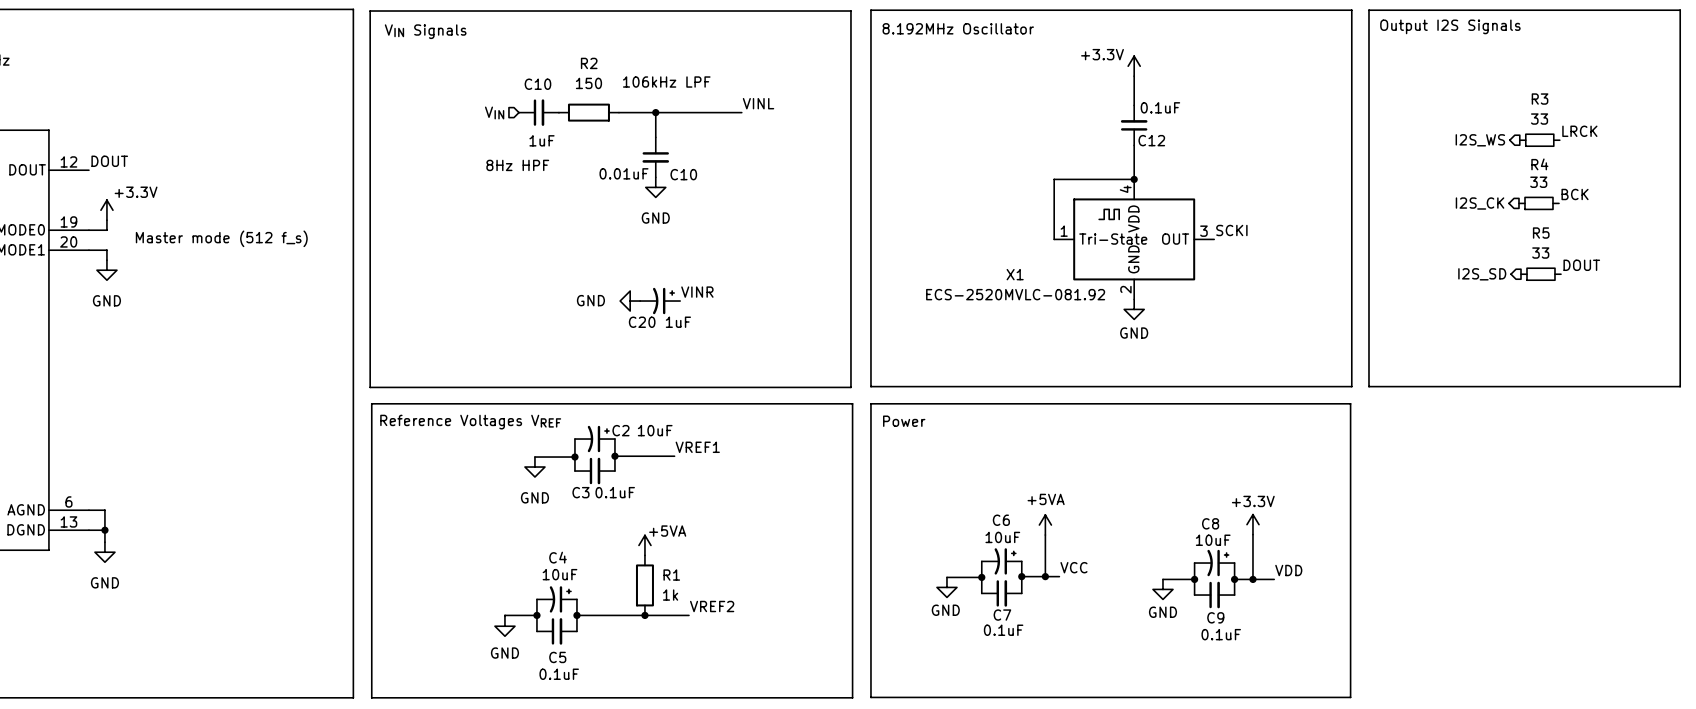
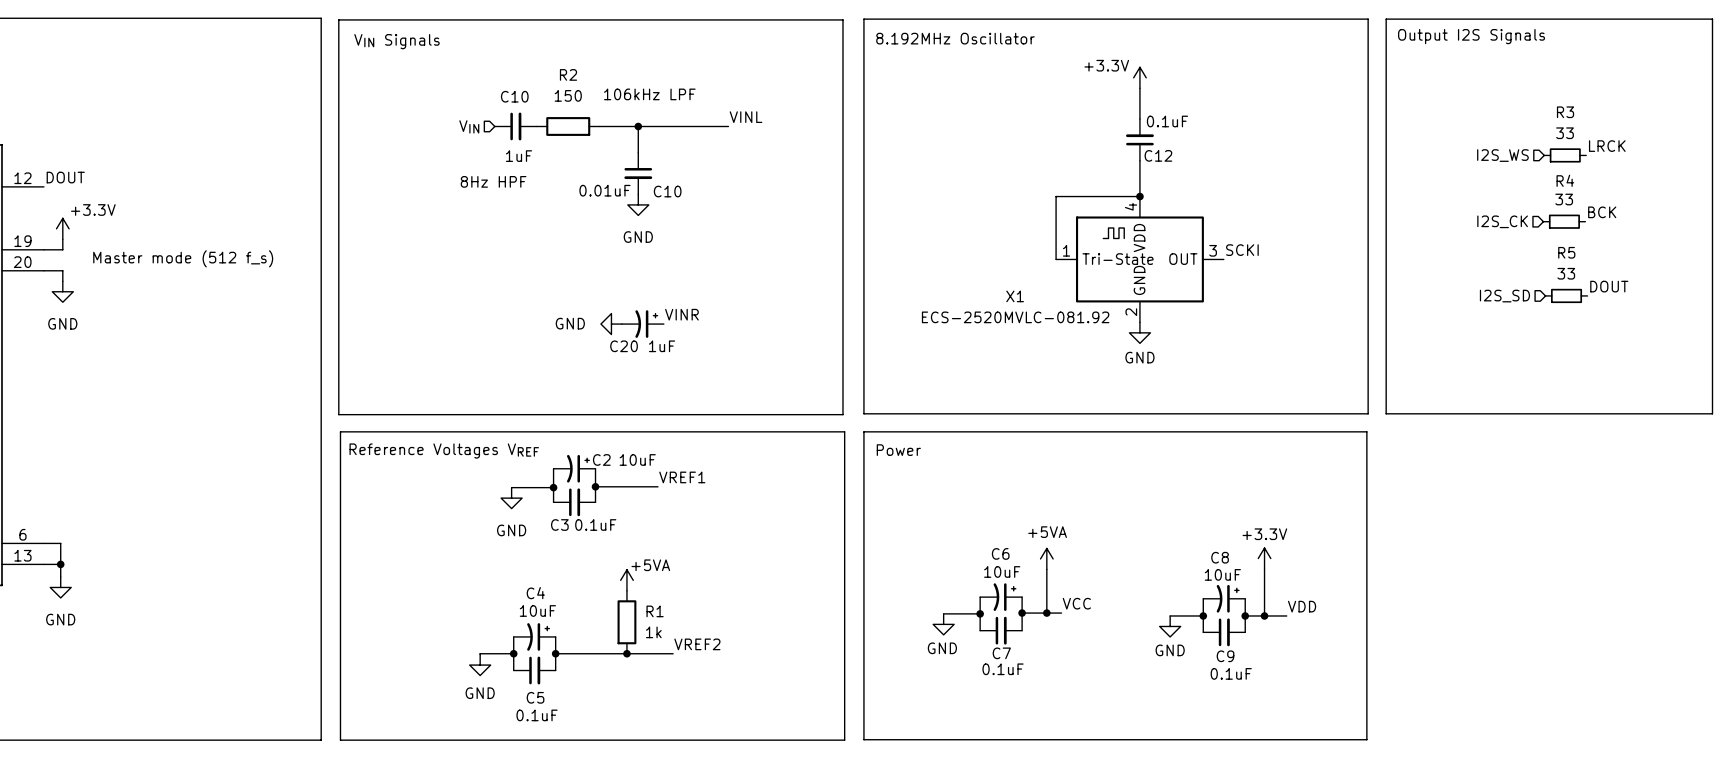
hierarchical label shape: output (1480, 140) -> input (1502, 155)
hierarchical label shape: output (1480, 203) -> input (1502, 221)
hierarchical label shape: output (1482, 274) -> input (1504, 296)

